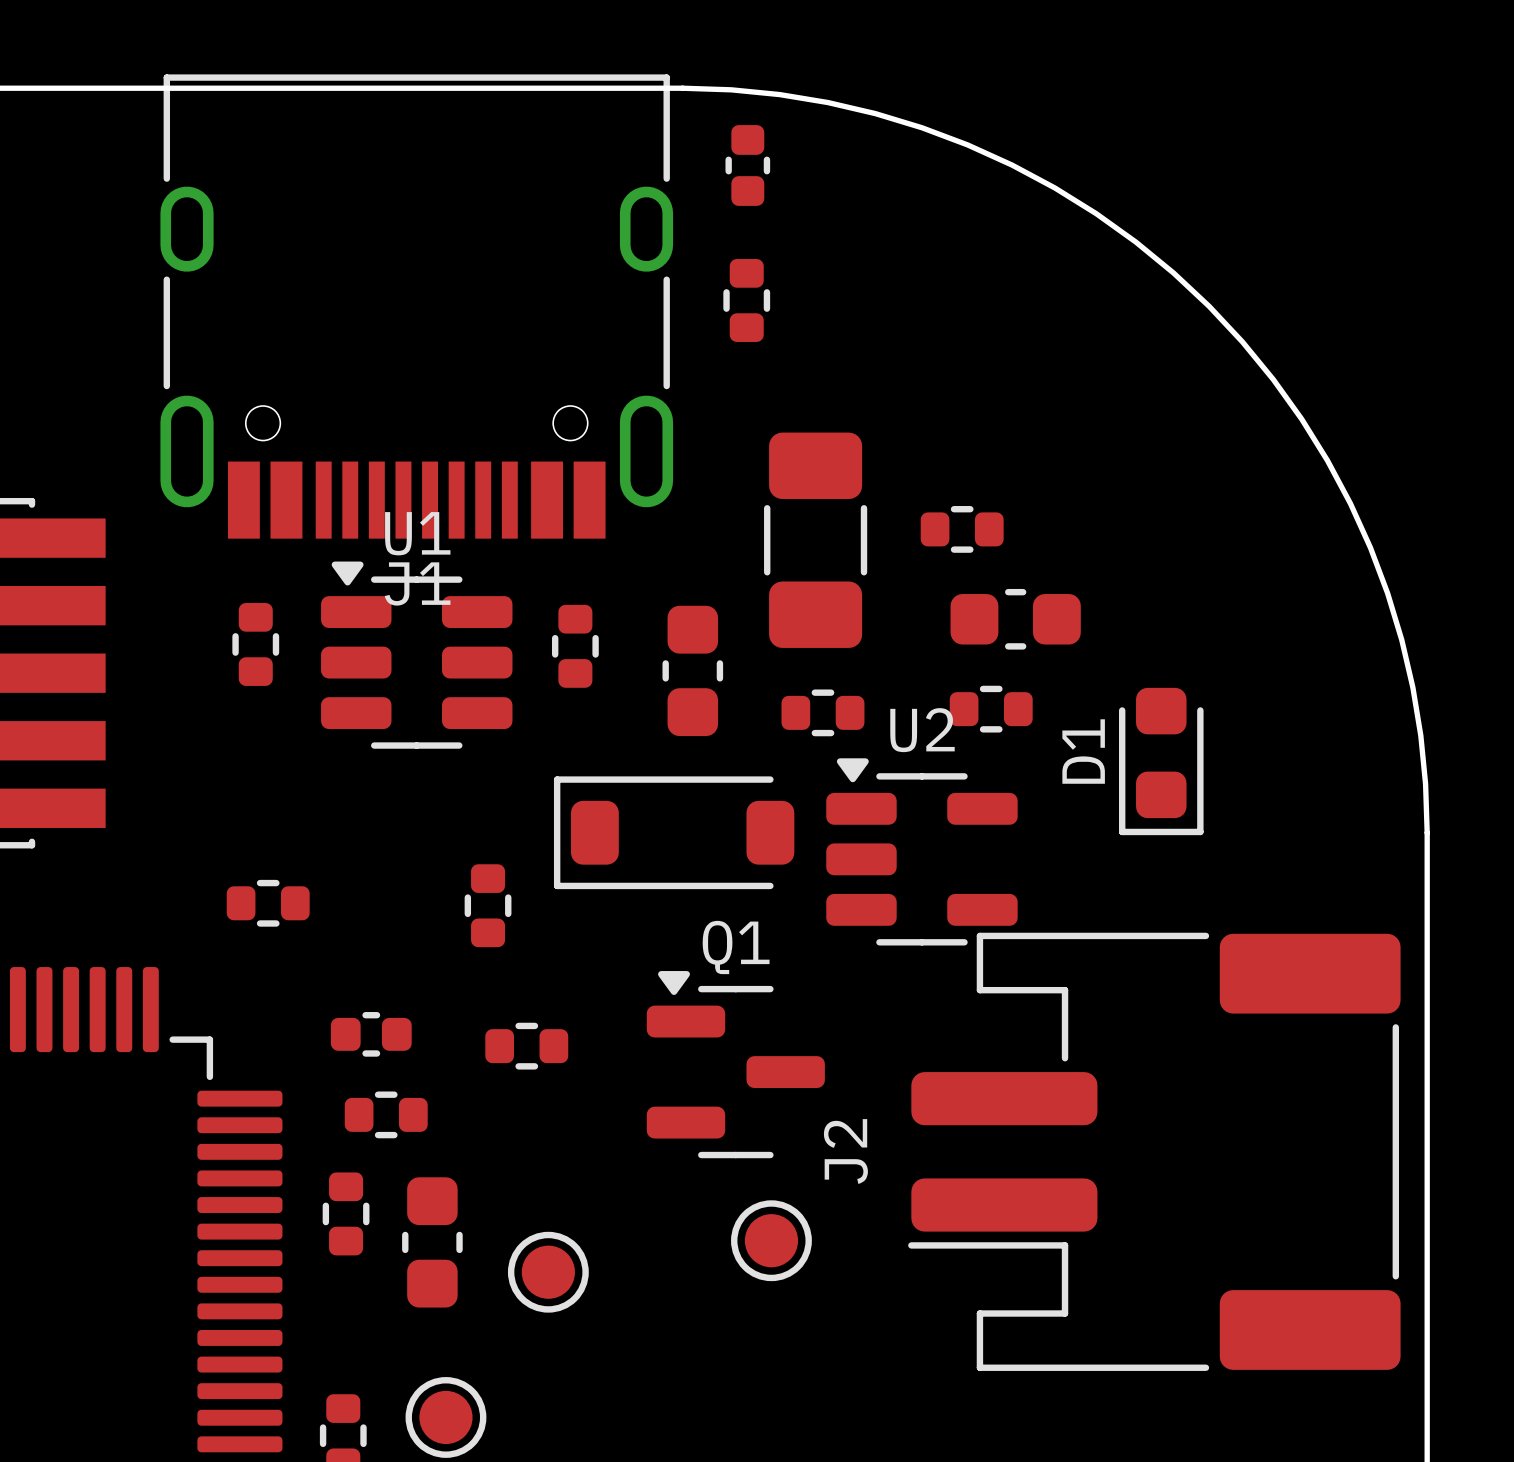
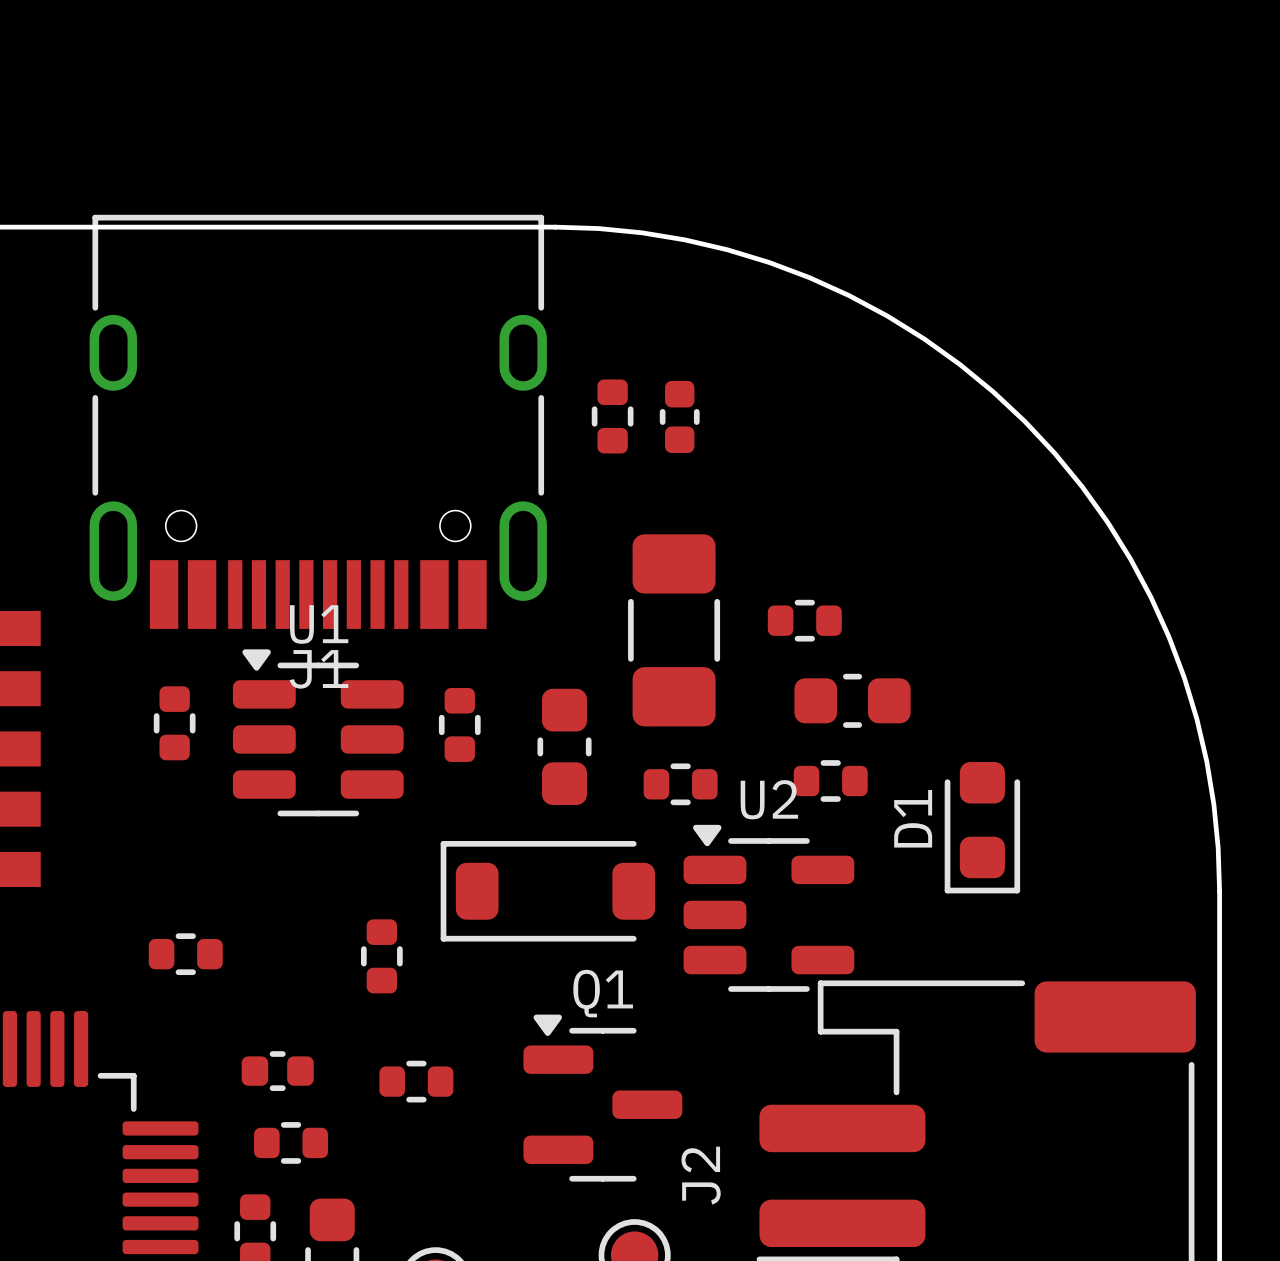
part position: (747, 165) -> (679, 416)

